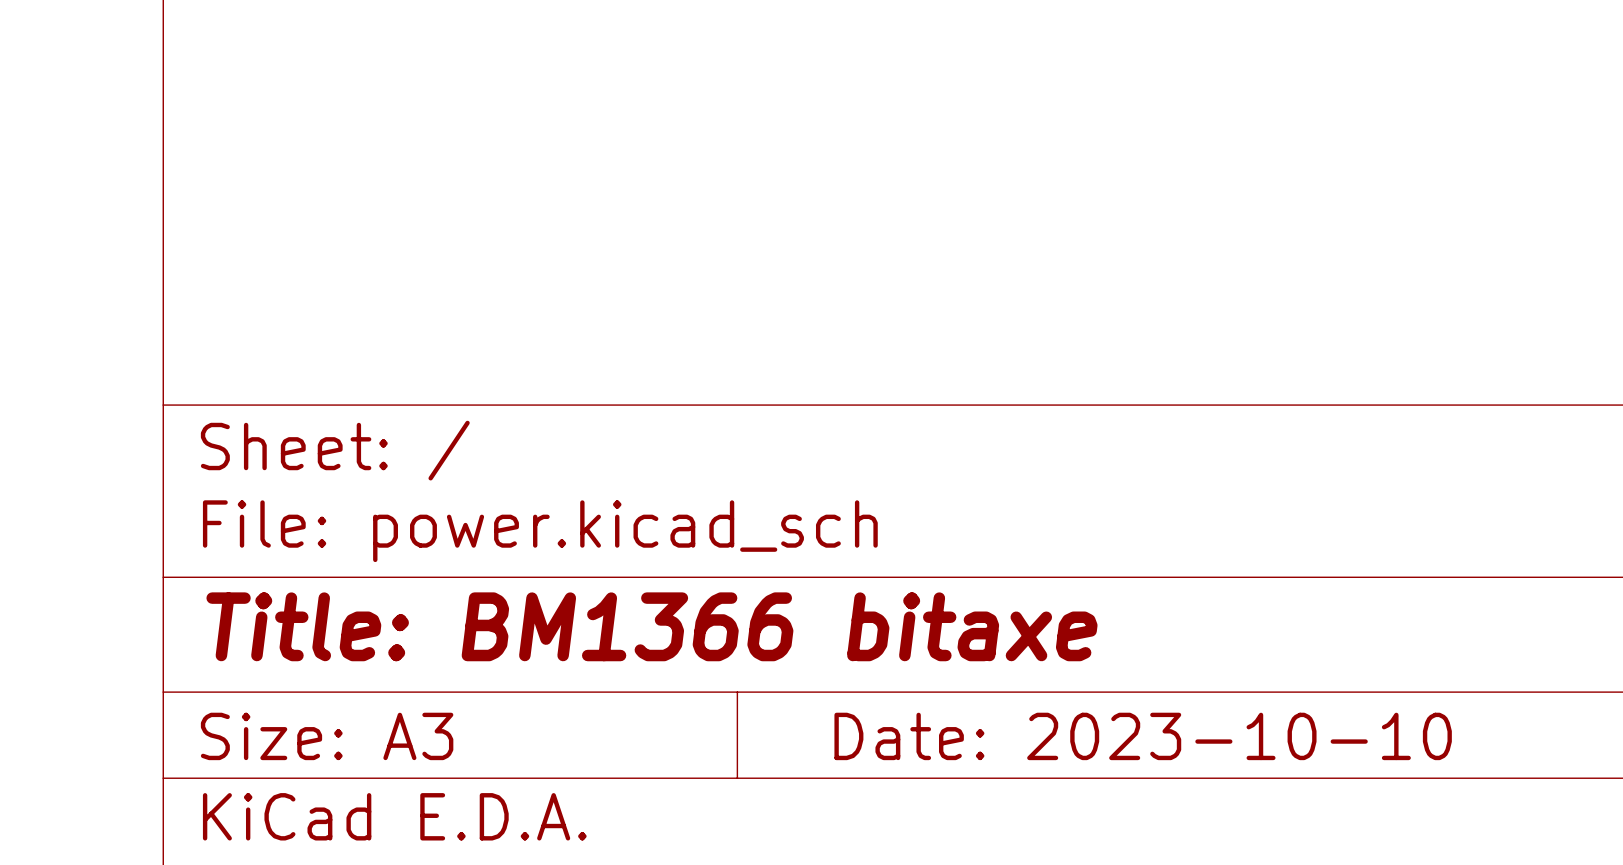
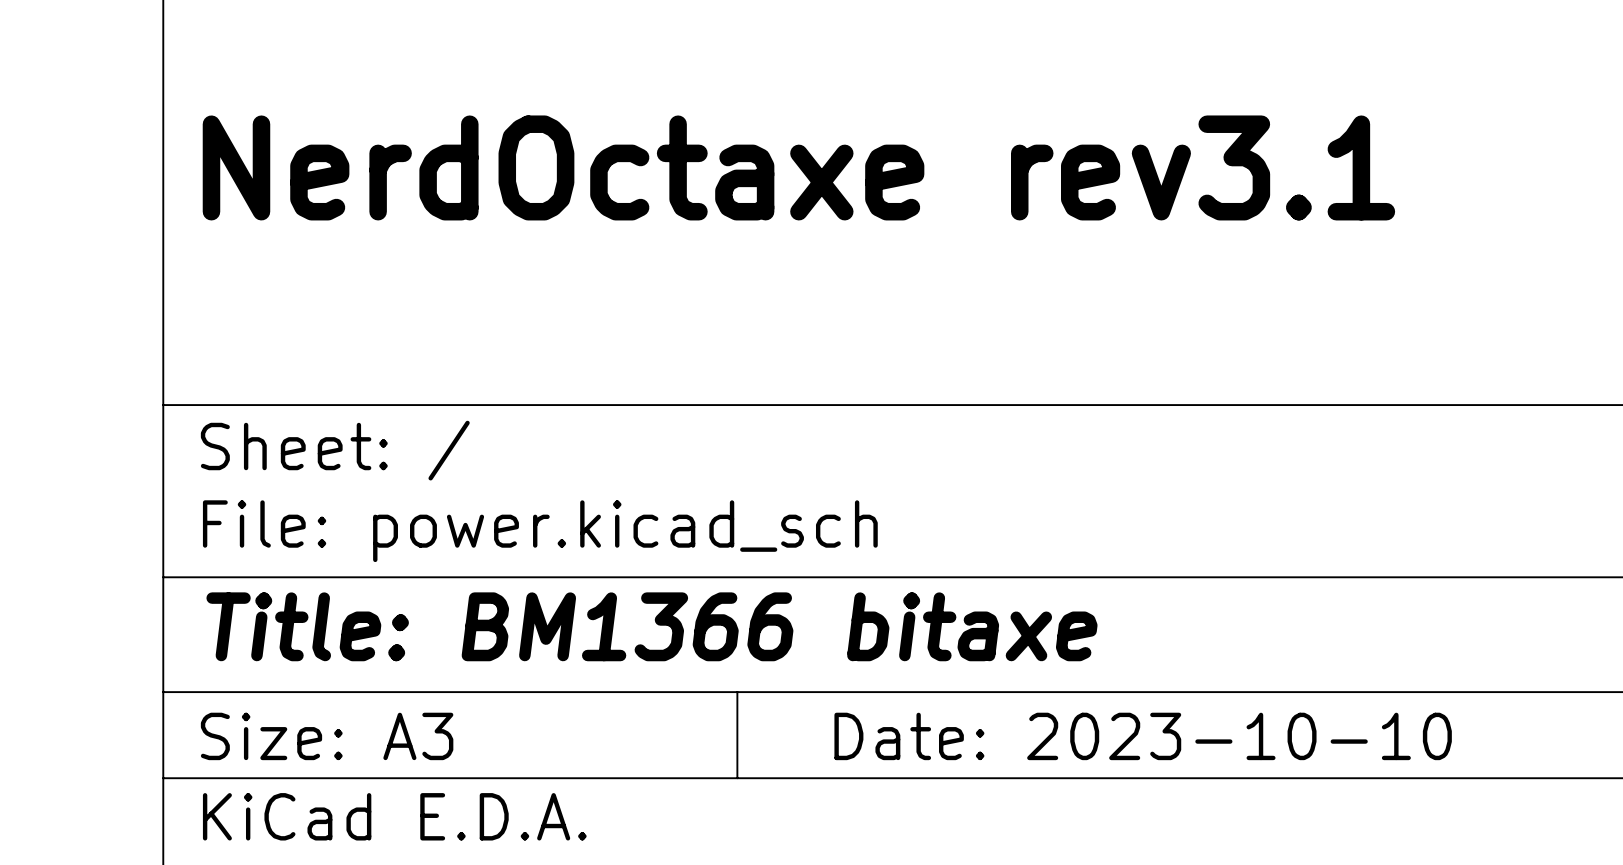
text: none -> NerdOctaxe rev3.1 (798, 167)

